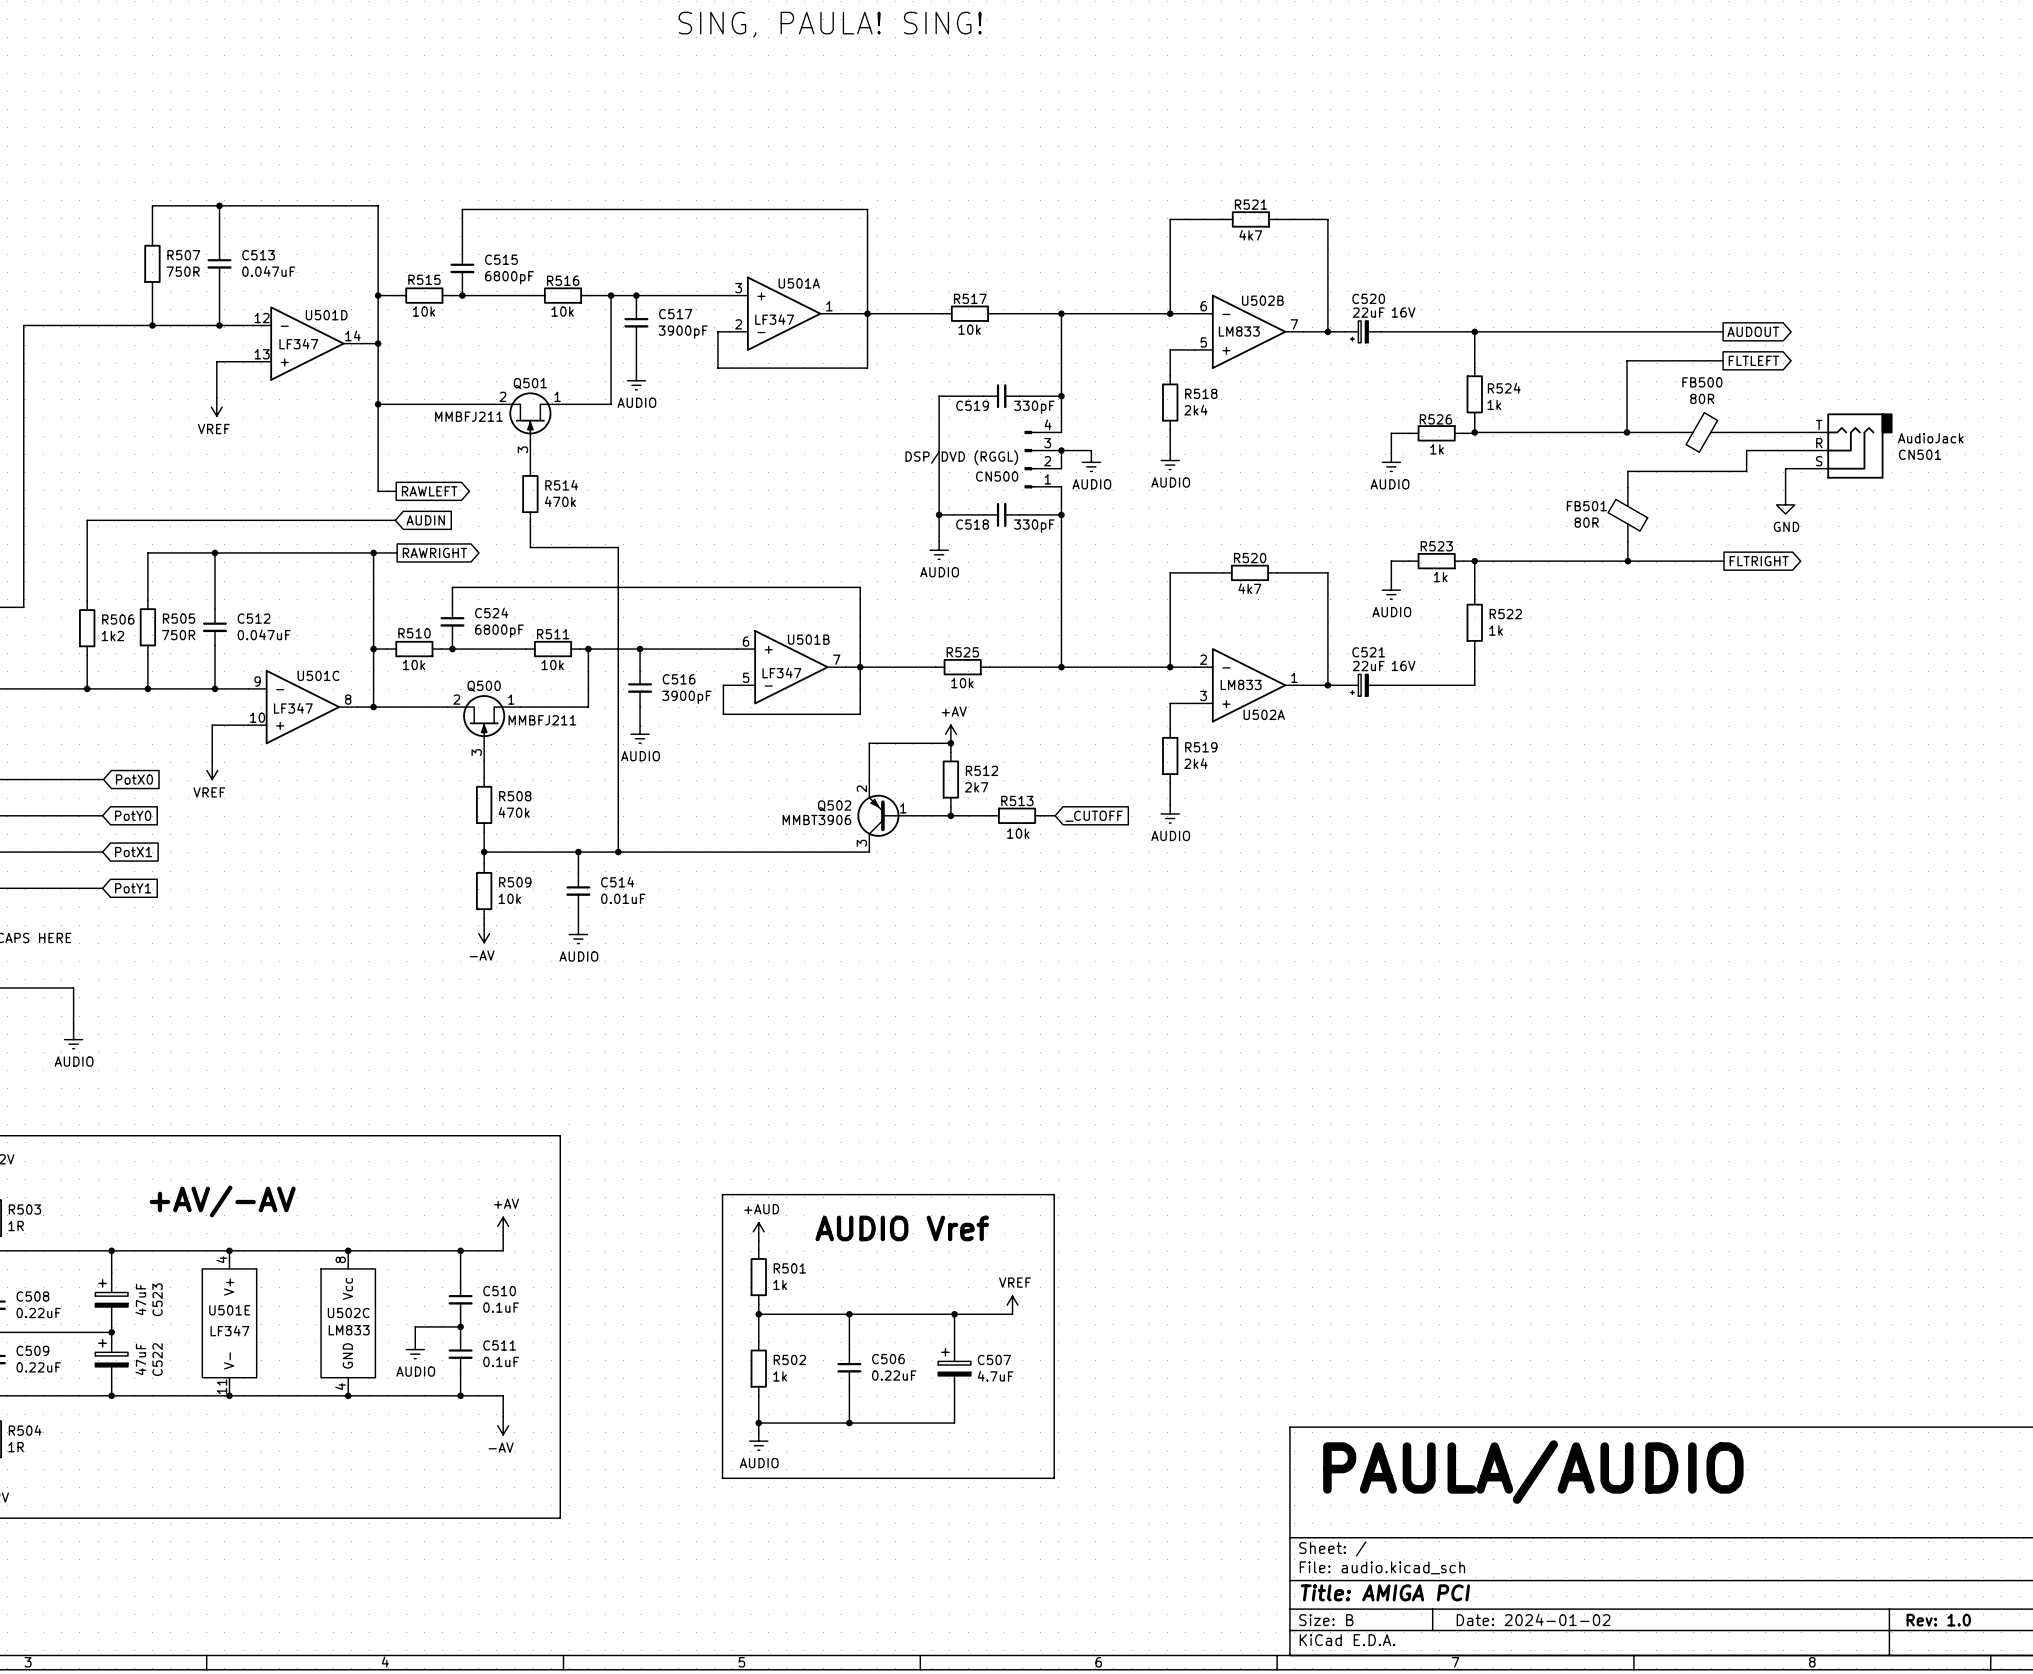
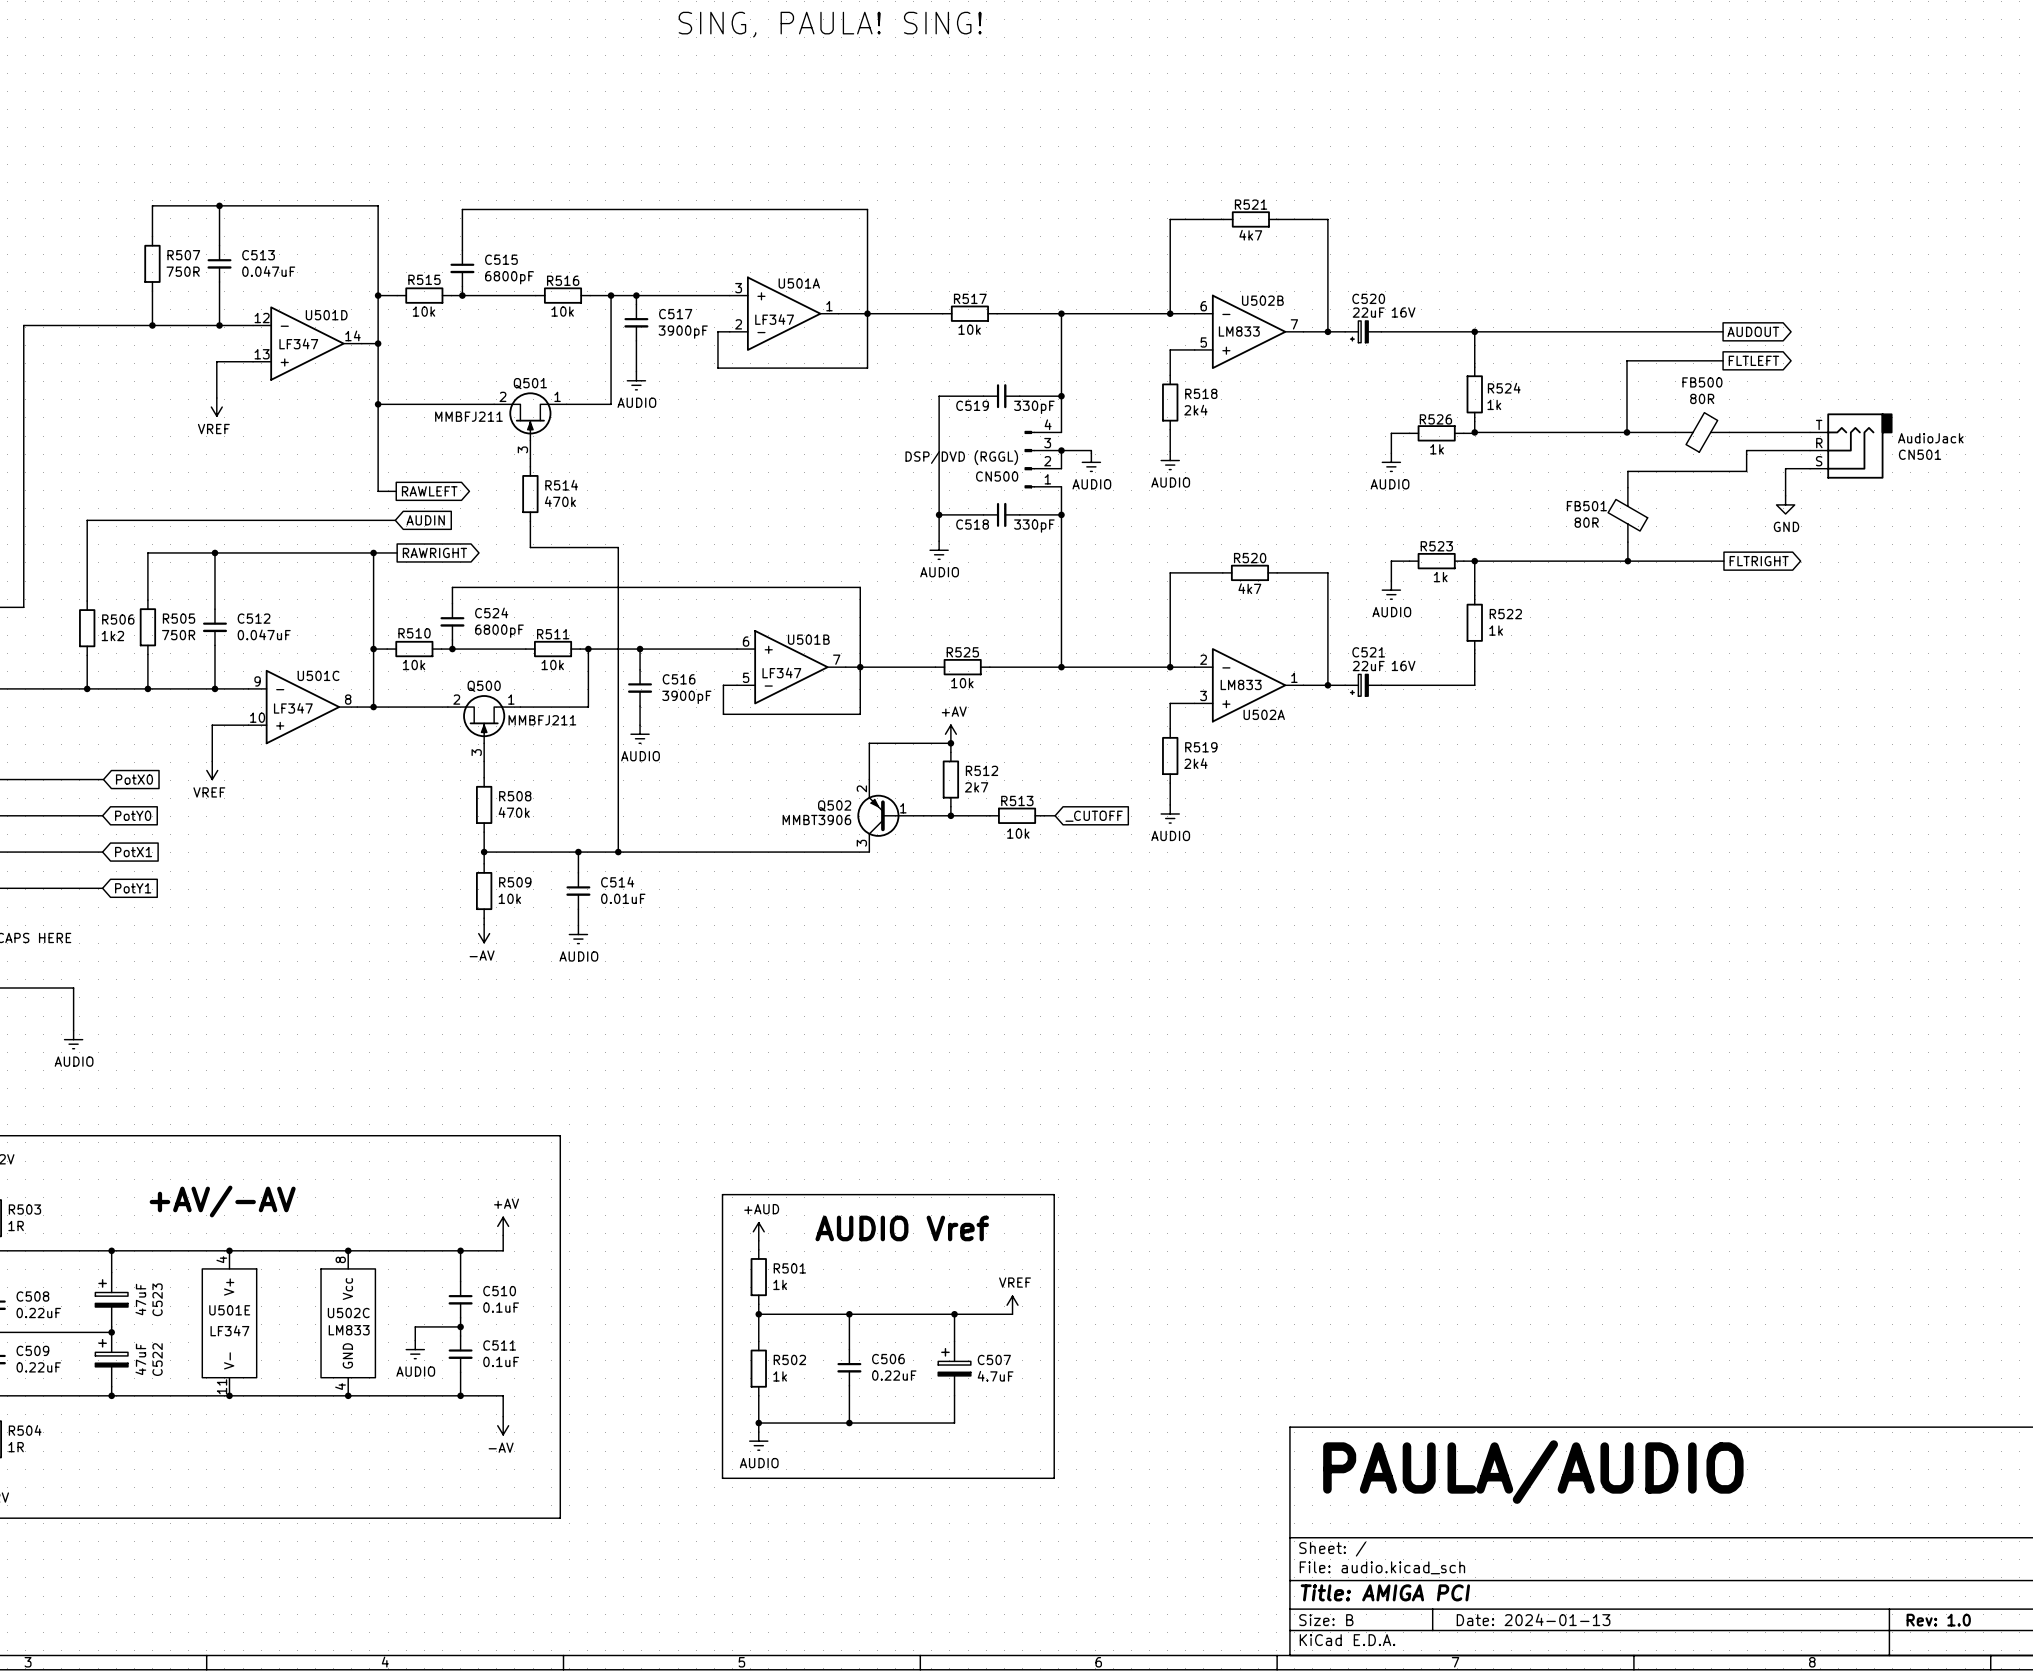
title block: Date: 2024-01-02 (1533, 1619) -> Date: 2024-01-13 (1533, 1619)

